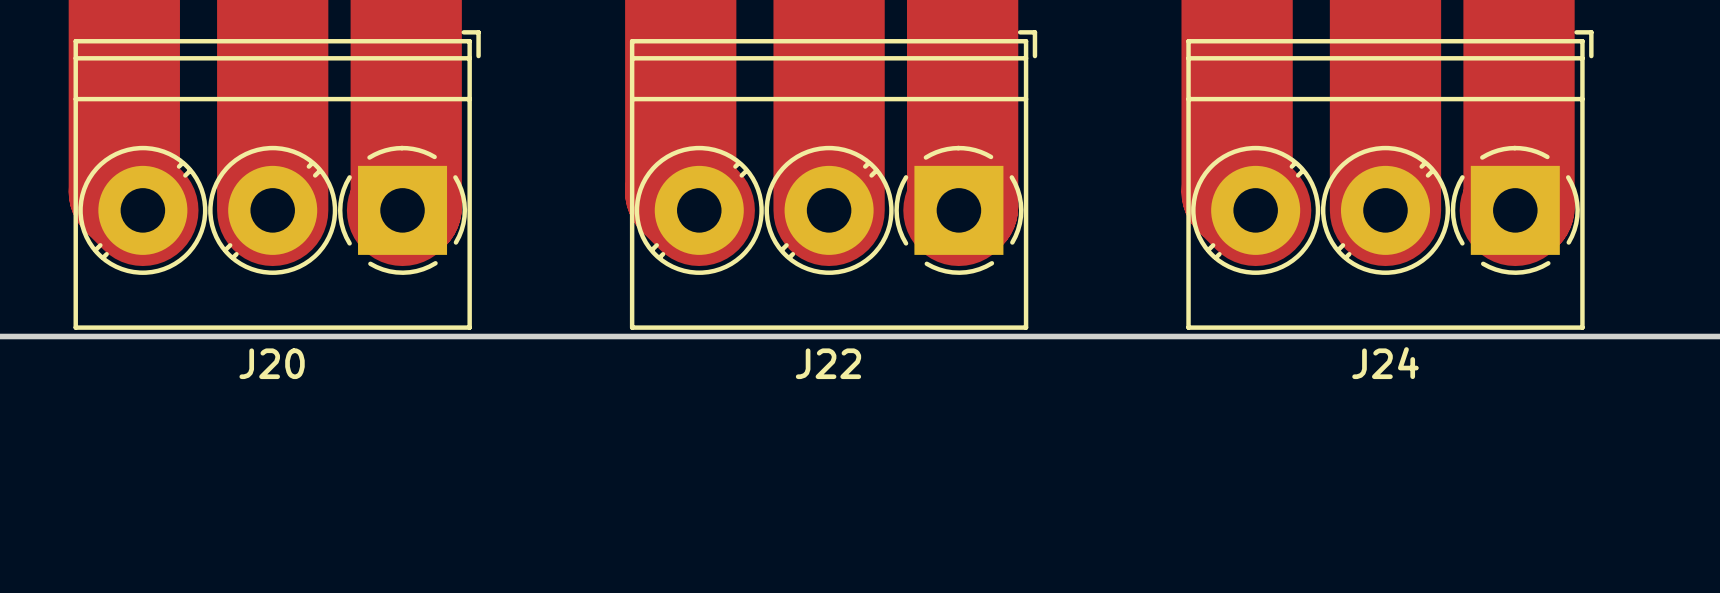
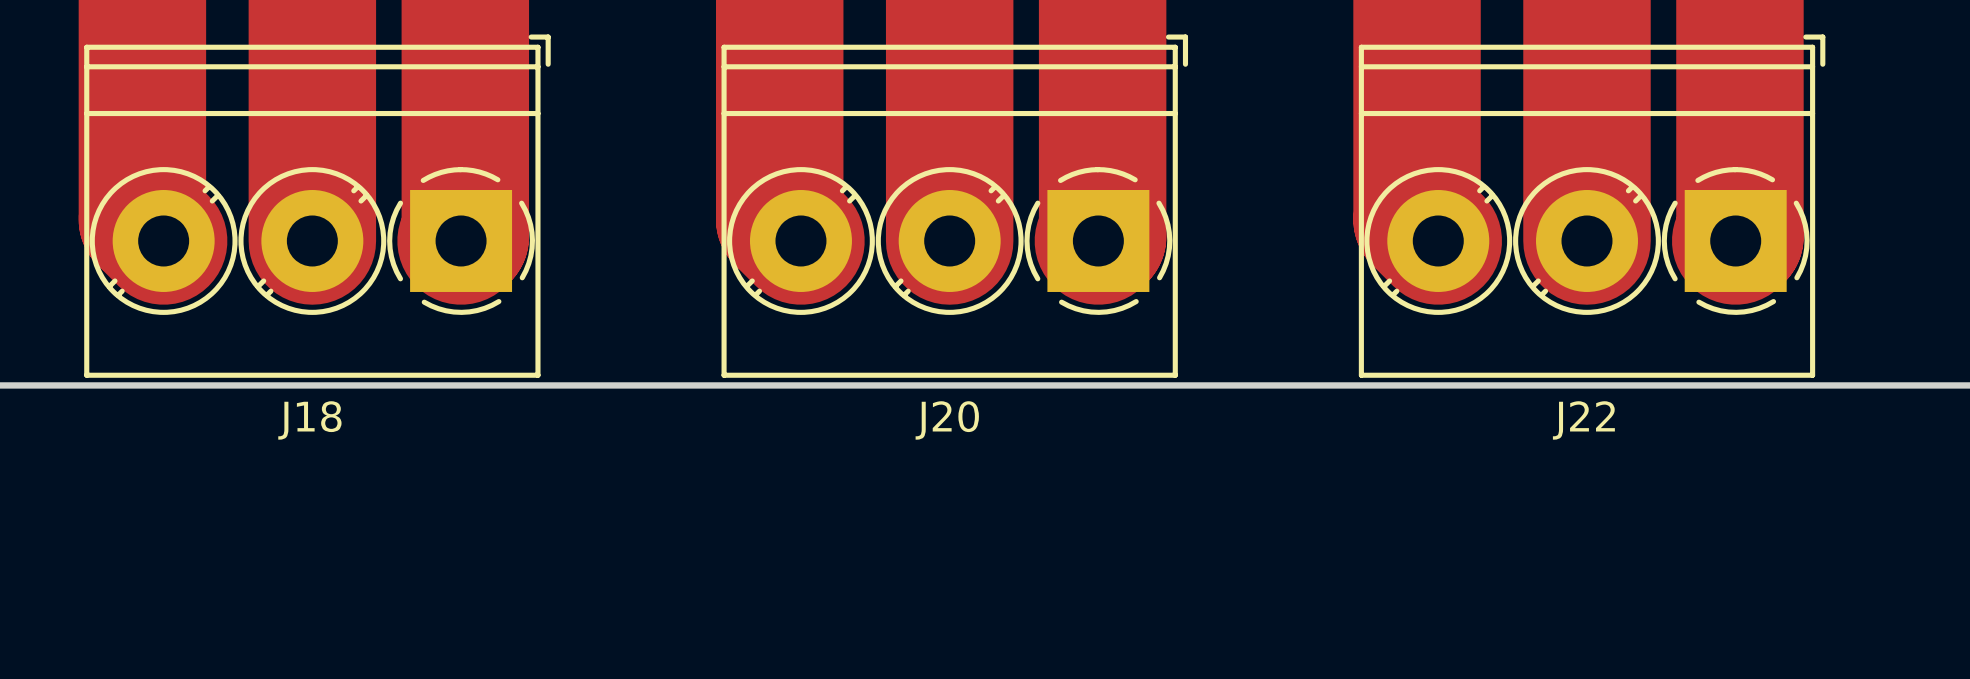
J20 name: J20 (272, 363) -> J18 (309, 420)
J22 name: J22 (828, 363) -> J20 (947, 420)
J24 name: J24 (1385, 363) -> J22 (1583, 420)

